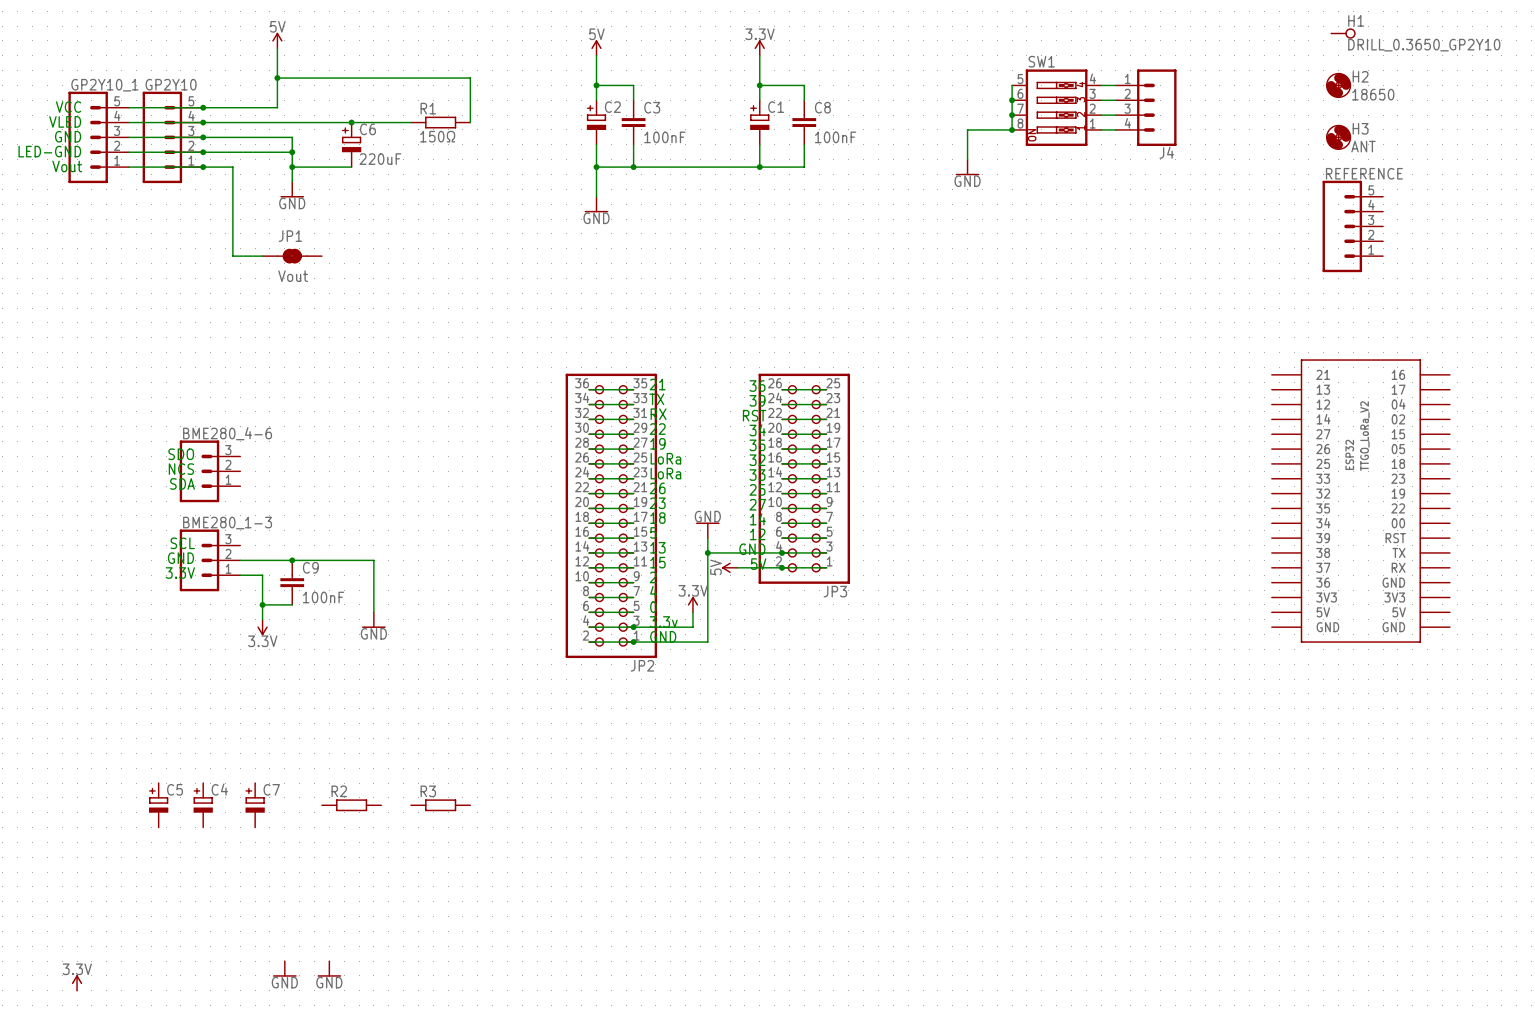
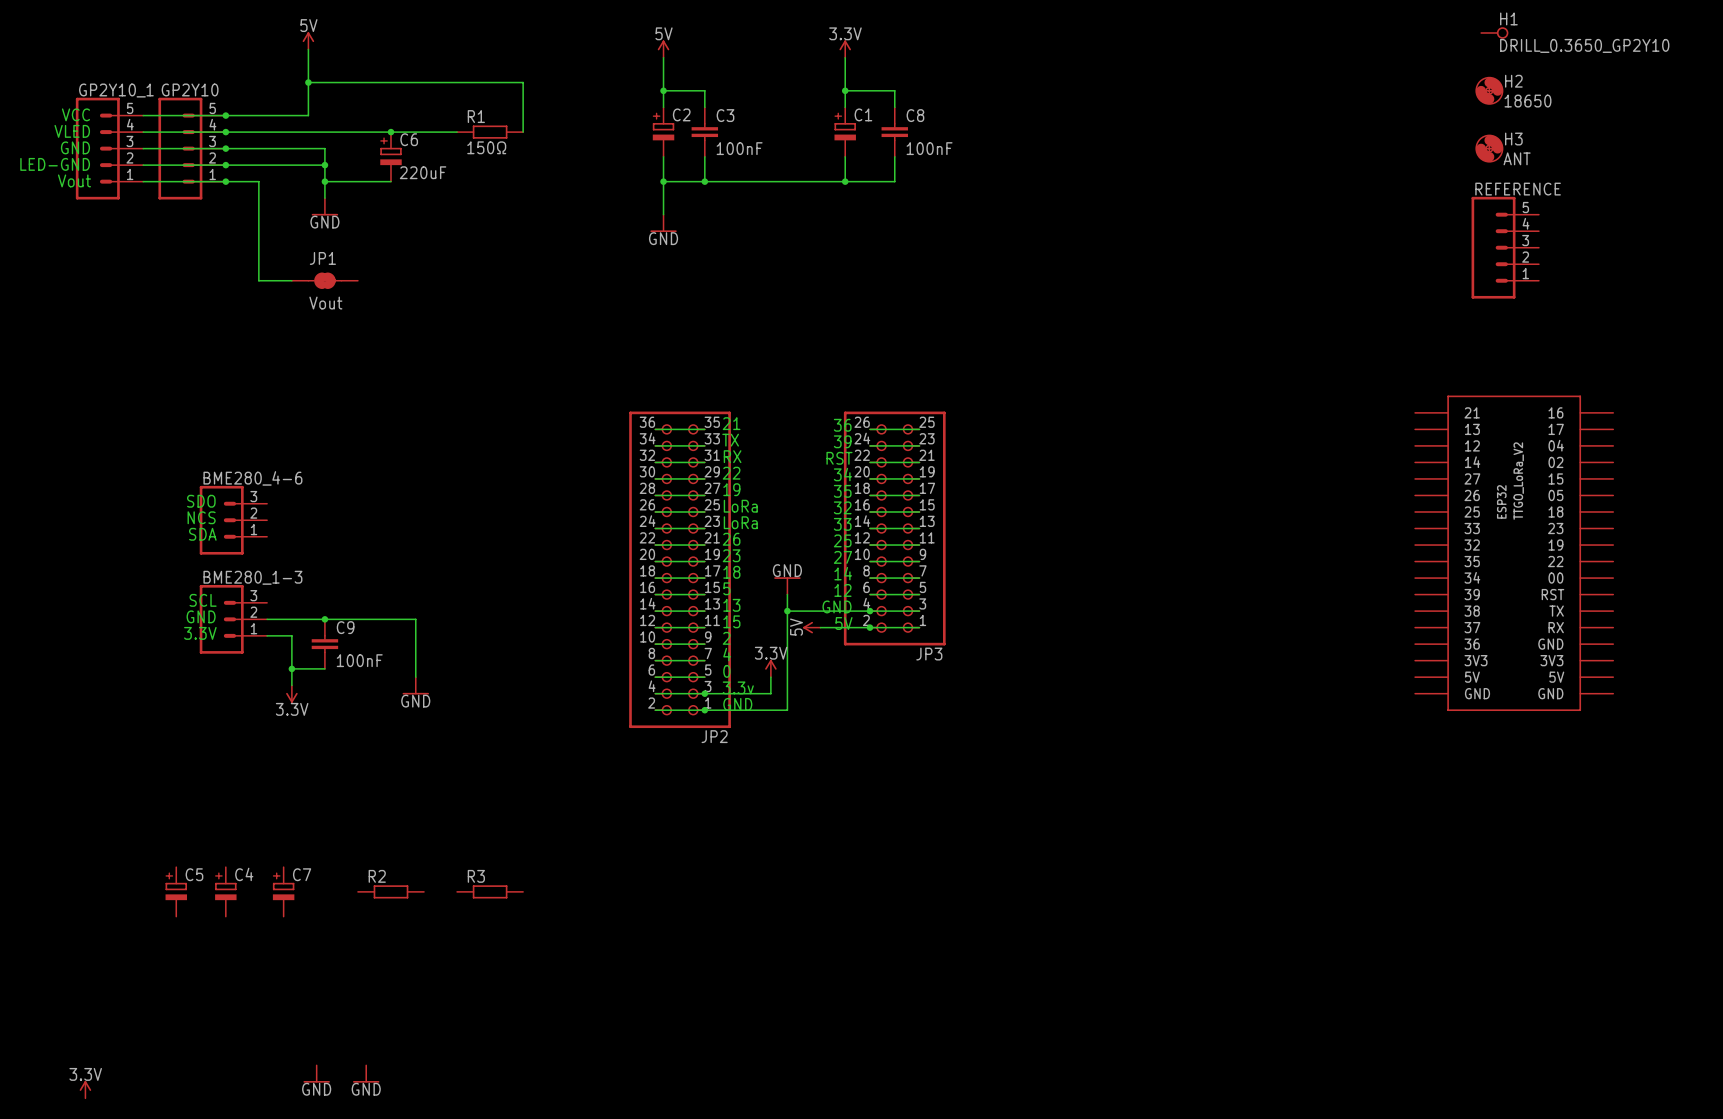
wire: (1012, 85) (1012, 129) (967, 129) (967, 159) -> none
wire: (1101, 85) (1115, 85) -> none
junction: (1012, 100) -> none
wire: (1101, 100) (1115, 100) -> none
SW1: (1056, 107) -> none
J4: (1146, 107) -> none
junction: (1012, 115) -> none
wire: (1101, 115) (1115, 115) -> none
junction: (1012, 129) -> none
wire: (1101, 129) (1115, 129) -> none
power symbol: GND (967, 167) -> none

